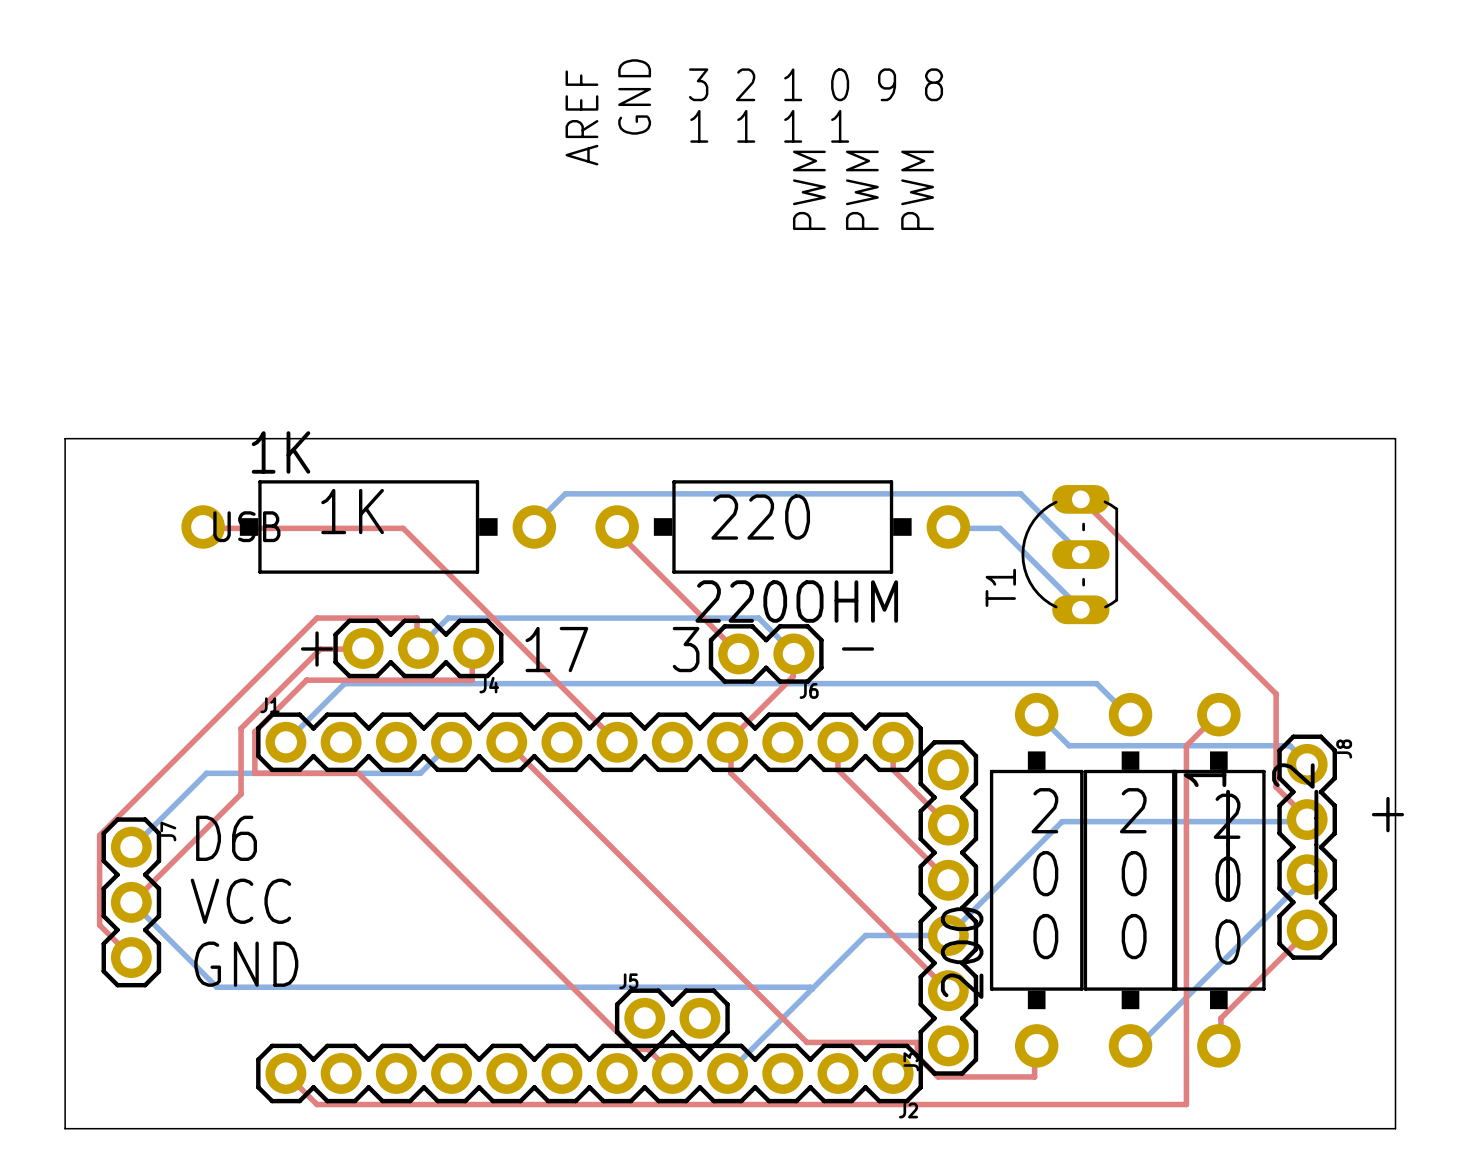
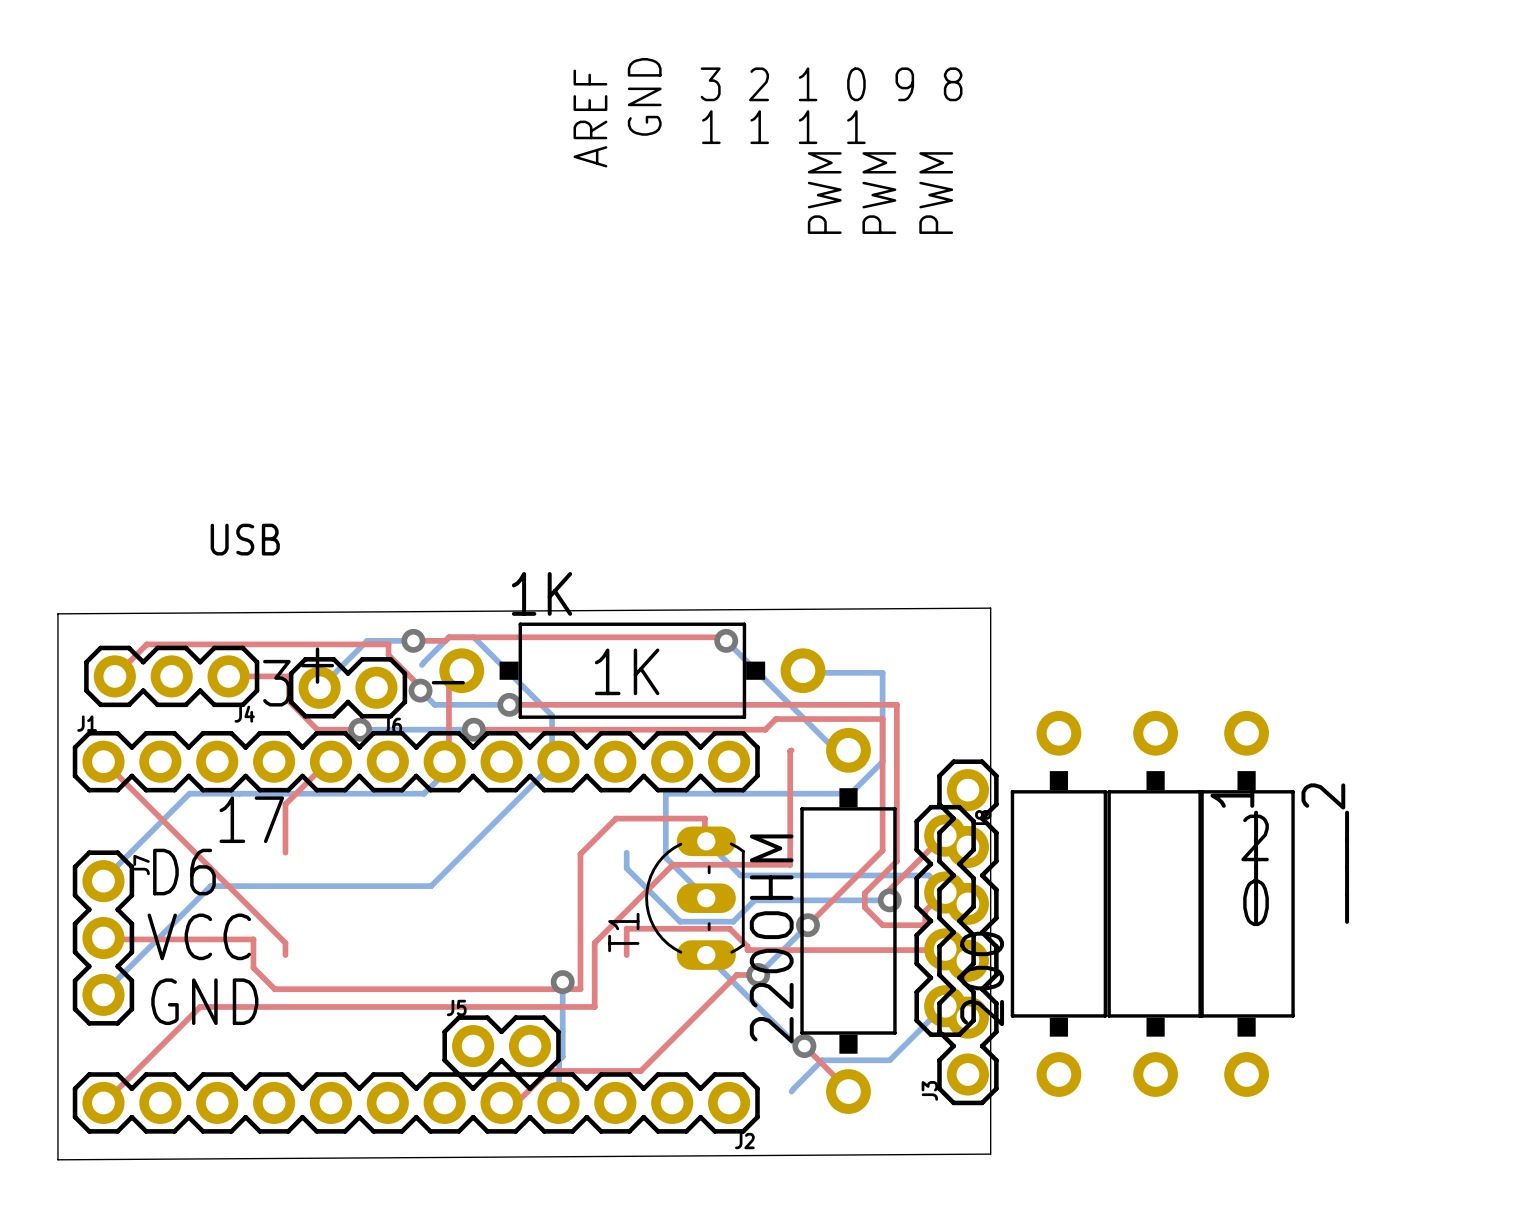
top track: (1080, 499) (1276, 693) (1276, 787) (1307, 819) -> none
text position: 1K (352, 511) -> 1K (627, 671)
text: 220 (760, 517) -> none
top track: (203, 526) (403, 528) (617, 742) -> none
1K position: (368, 526) -> (632, 670)
bottom track: (534, 526) (565, 493) (1020, 493) (1080, 554) -> none
top track: (617, 526) (617, 531) (738, 653) -> none
220OHM rotation: 0° (782, 526) -> 90° clockwise (848, 920)
220OHM position: (782, 526) -> (848, 920)
bottom track: (948, 526) (1000, 528) (1080, 609) -> none
T1 position: (1069, 554) -> (694, 898)
board edge: (65, 598) (65, 438) (1395, 438) (1395, 1128) (65, 1128) -> (57, 613) (990, 608) (990, 1154) (57, 1159)
bottom track: (444, 621) (448, 618) (758, 618) (793, 653) -> (448, 637) (473, 637) (552, 715) (552, 761) (558, 761)
top track: none -> (413, 640) (445, 640) (448, 637) (726, 637) (726, 640)
bottom track: none -> (413, 640) (367, 640) (319, 687)
via: none -> (413, 640)
bottom track: none -> (726, 640) (832, 747) (847, 747) (848, 750)
via: none -> (726, 640)
top track: (363, 648) (320, 649) (241, 728) (241, 794) (131, 902) -> none
top track: (418, 648) (417, 618) (316, 618) (99, 835) (99, 925) (131, 957) -> none
J4 position: (418, 648) -> (171, 676)
top track: (473, 648) (472, 680) (306, 680) (254, 731) (254, 773) (358, 773) (634, 1049) (648, 1049) (672, 1073) -> none
text position: 17 (556, 649) -> 17 (251, 819)
text position: 3 (686, 649) -> 3 (276, 683)
text position: - (858, 649) -> - (448, 682)
top track: none -> (461, 670) (448, 683) (448, 758) (444, 761)
J6 position: (766, 653) -> (348, 687)
bottom track: none -> (802, 670) (804, 672) (882, 672) (882, 761) (850, 793) (665, 793) (665, 857) (706, 898)
top track: (793, 653) (793, 676) (727, 742) (731, 742) (731, 773) (948, 990) -> none
top track: none -> (114, 676) (146, 644) (388, 644) (388, 655) (420, 687) (420, 690)
top track: none -> (228, 676) (289, 676) (289, 701) (317, 729) (360, 729)
bottom track: none -> (420, 690) (434, 704) (509, 704)
via: none -> (420, 690)
top track: none -> (509, 704) (896, 704) (896, 861) (864, 893) (864, 907) (882, 925) (925, 925) (925, 910) (945, 892)
via: none -> (509, 704)
bottom track: none -> (360, 729) (473, 729)
via: none -> (360, 729)
top track: none -> (473, 729) (765, 729) (775, 719) (882, 719) (882, 850) (807, 925)
via: none -> (473, 729)
bottom track: (1036, 714) (1069, 745) (1289, 745) (1307, 764) -> none
bottom track: (1130, 714) (1127, 714) (1096, 683) (344, 683) (285, 742) -> none
top track: (1218, 714) (1186, 745) (1186, 1104) (316, 1104) (285, 1073) -> none
top track: none -> (791, 750) (790, 864) (672, 864) (594, 942) (594, 1006) (200, 1006) (103, 1102)
top track: none -> (103, 761) (285, 942) (285, 955)
top track: none -> (330, 761) (328, 761) (285, 804) (285, 852)
top track: (506, 742) (806, 1042) (917, 1042) (917, 1056) (938, 1076) (1034, 1076) (1034, 1045) (1036, 1045) -> none
bottom track: none -> (555, 761) (431, 886) (210, 886) (103, 994)
J1 position: (589, 742) -> (416, 761)
top track: (837, 742) (837, 769) (948, 880) -> none
top track: (893, 742) (893, 769) (948, 825) -> none
bottom track: (206, 773) (131, 847) -> (203, 793) (189, 793) (103, 881)
text: 2 (1044, 810) -> none
text: 2 (1133, 810) -> none
top track: none -> (945, 835) (889, 889) (889, 900)
text: + (1387, 814) -> none
top track: none -> (706, 841) (704, 818) (616, 818) (580, 854) (580, 989) (274, 989) (253, 967) (253, 939) (103, 938)
bottom track: none -> (706, 841) (740, 875) (928, 875) (945, 892)
bottom track: (1307, 819) (1307, 821) (1062, 821) (948, 935) (865, 935) (727, 1073) -> none
bottom track: none -> (626, 852) (626, 868) (680, 921) (733, 921) (754, 900) (889, 900)
text position: D6 (226, 838) -> D6 (184, 872)
J8 position: (1307, 847) -> (945, 920)
text: 0 (1045, 873) -> none
text: 0 (1134, 873) -> none
bottom track: (1307, 874) (1138, 1045) (1130, 1045) -> none
via: none -> (889, 900)
bottom track: none -> (807, 925) (758, 974)
via: none -> (807, 925)
text position: VCC (240, 901) -> VCC (199, 936)
bottom track: (131, 902) (216, 987) (810, 987) (812, 988) -> none
J7 position: (131, 902) -> (103, 938)
top track: none -> (945, 949) (747, 950) (747, 946) (729, 928) (626, 928) (626, 955)
bottom track: none -> (706, 955) (797, 1046) (804, 1046)
top track: (1307, 929) (1220, 1018) (1220, 1045) (1218, 1045) -> none
text: 0 (1045, 936) -> none
text: 0 (1134, 936) -> none
text: 0 (1227, 942) -> none
top track: none -> (758, 974) (736, 974) (640, 1070) (548, 1070) (516, 1102) (501, 1102)
via: none -> (758, 974)
bottom track: none -> (562, 982) (562, 1056) (559, 1060) (558, 1102)
via: none -> (562, 982)
text position: GND (246, 964) -> GND (204, 1001)
bottom track: none -> (945, 1006) (889, 1060) (822, 1060) (791, 1091)
J5 position: (672, 1018) -> (501, 1046)
top track: none -> (804, 1046) (848, 1091)
via: none -> (804, 1046)
J2 position: (589, 1073) -> (416, 1102)

